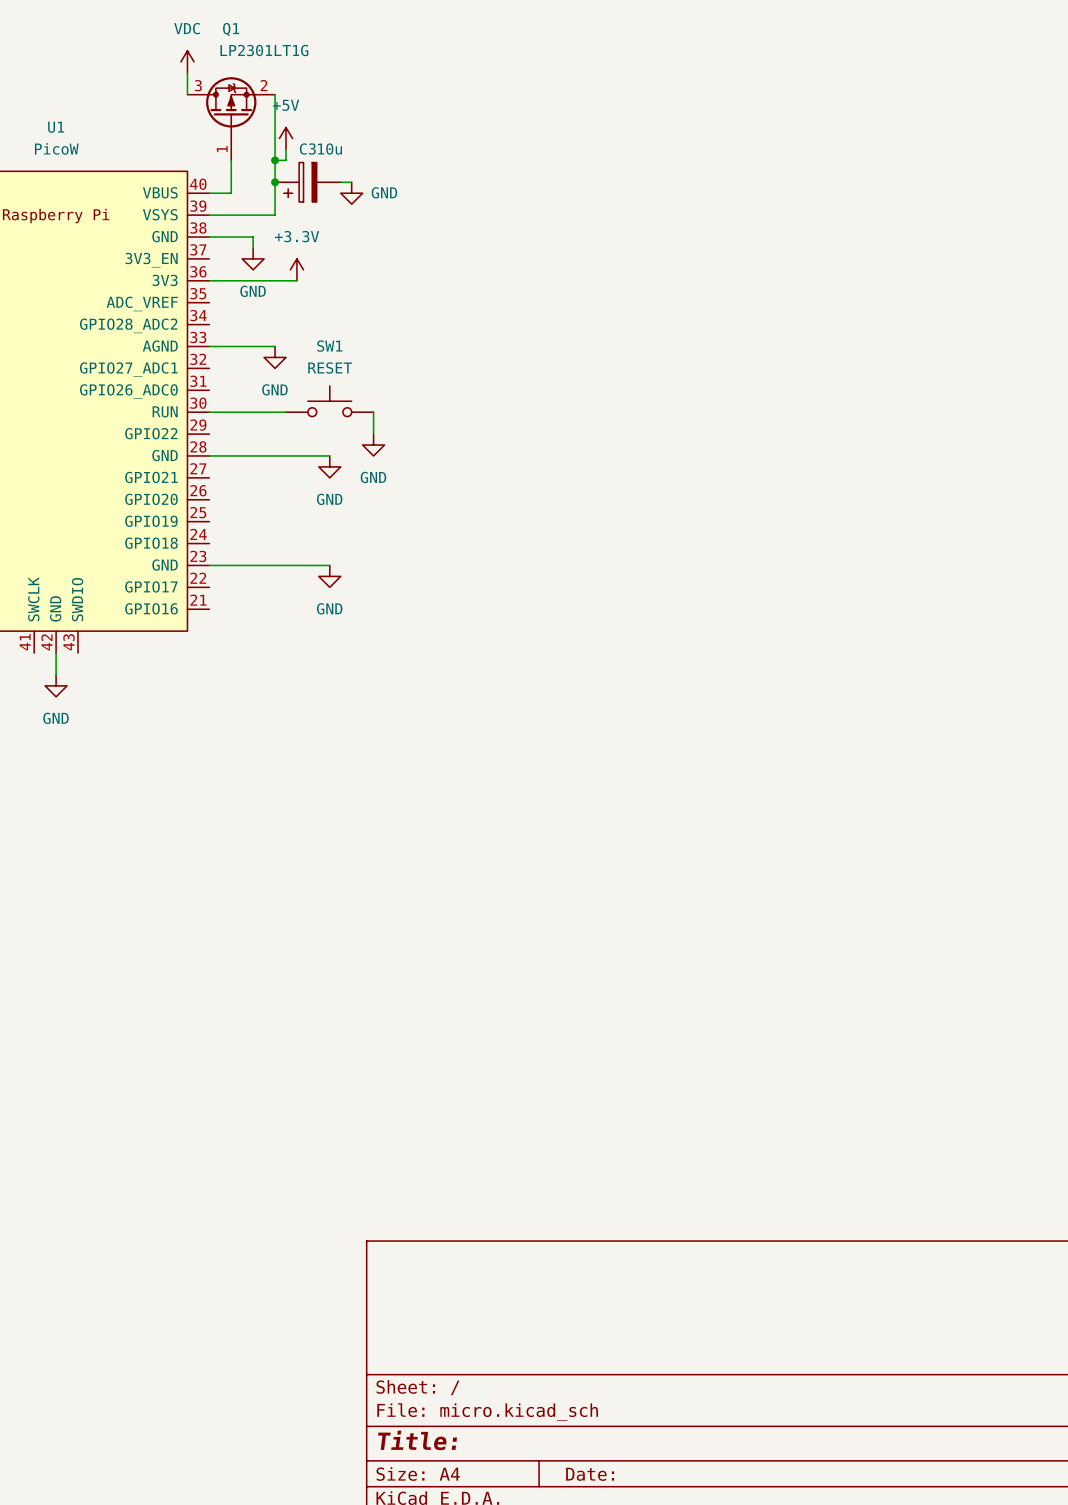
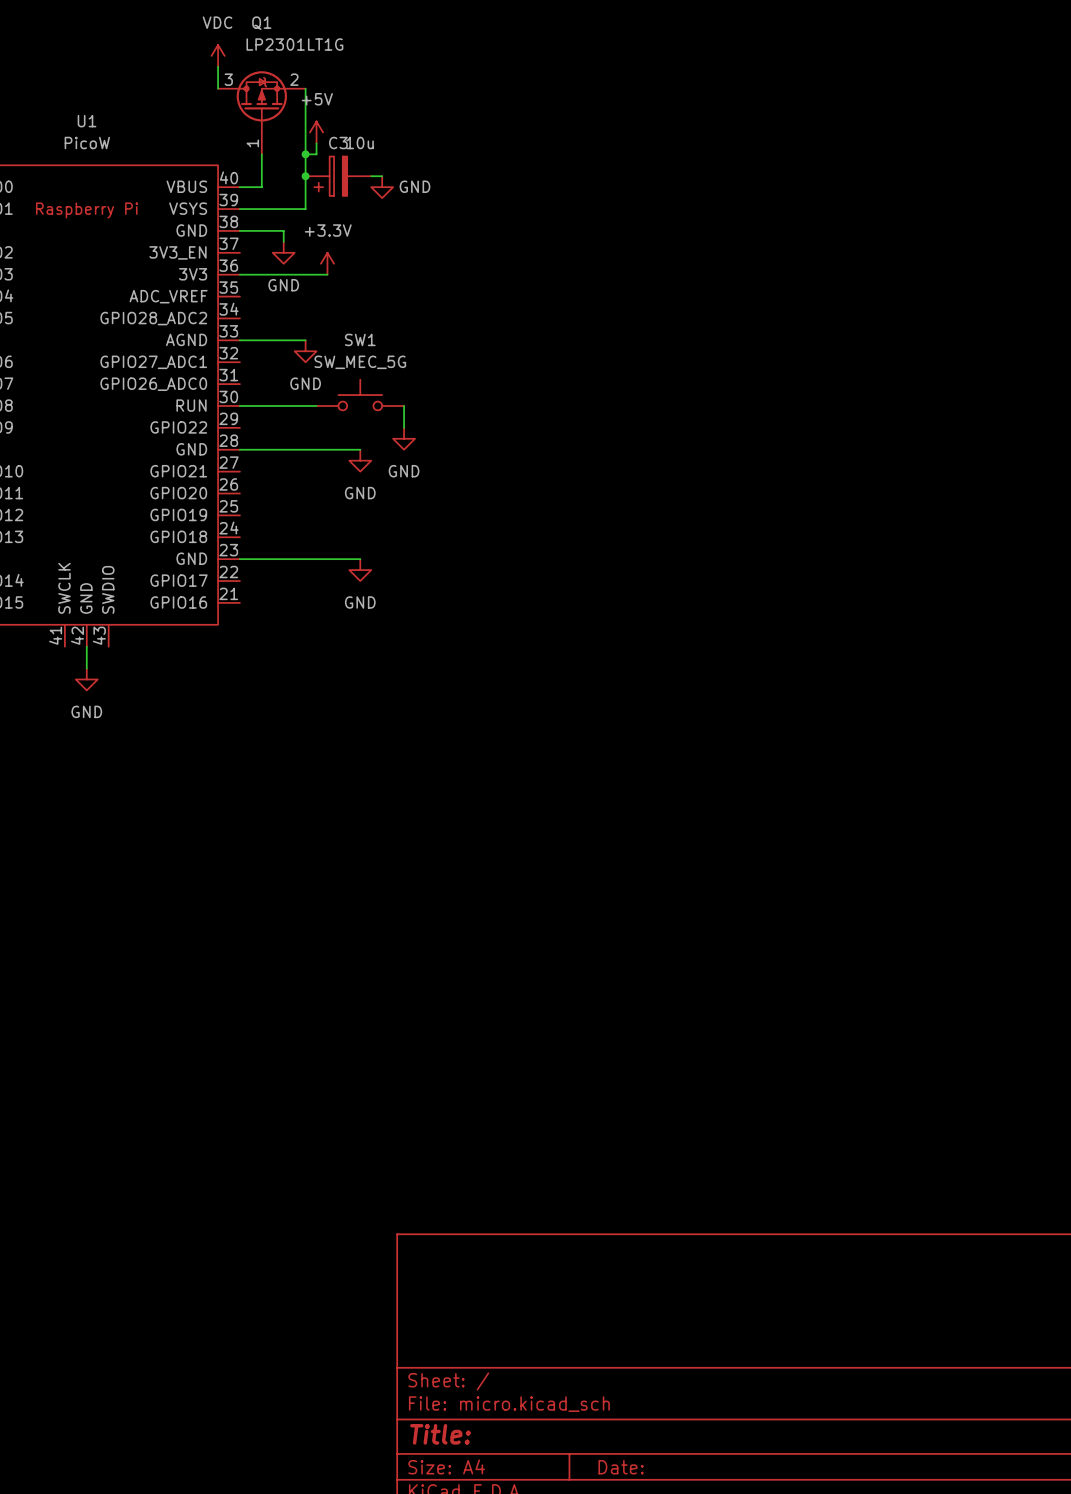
SW1 value: RESET (330, 367) -> SW_MEC_5G (360, 362)

